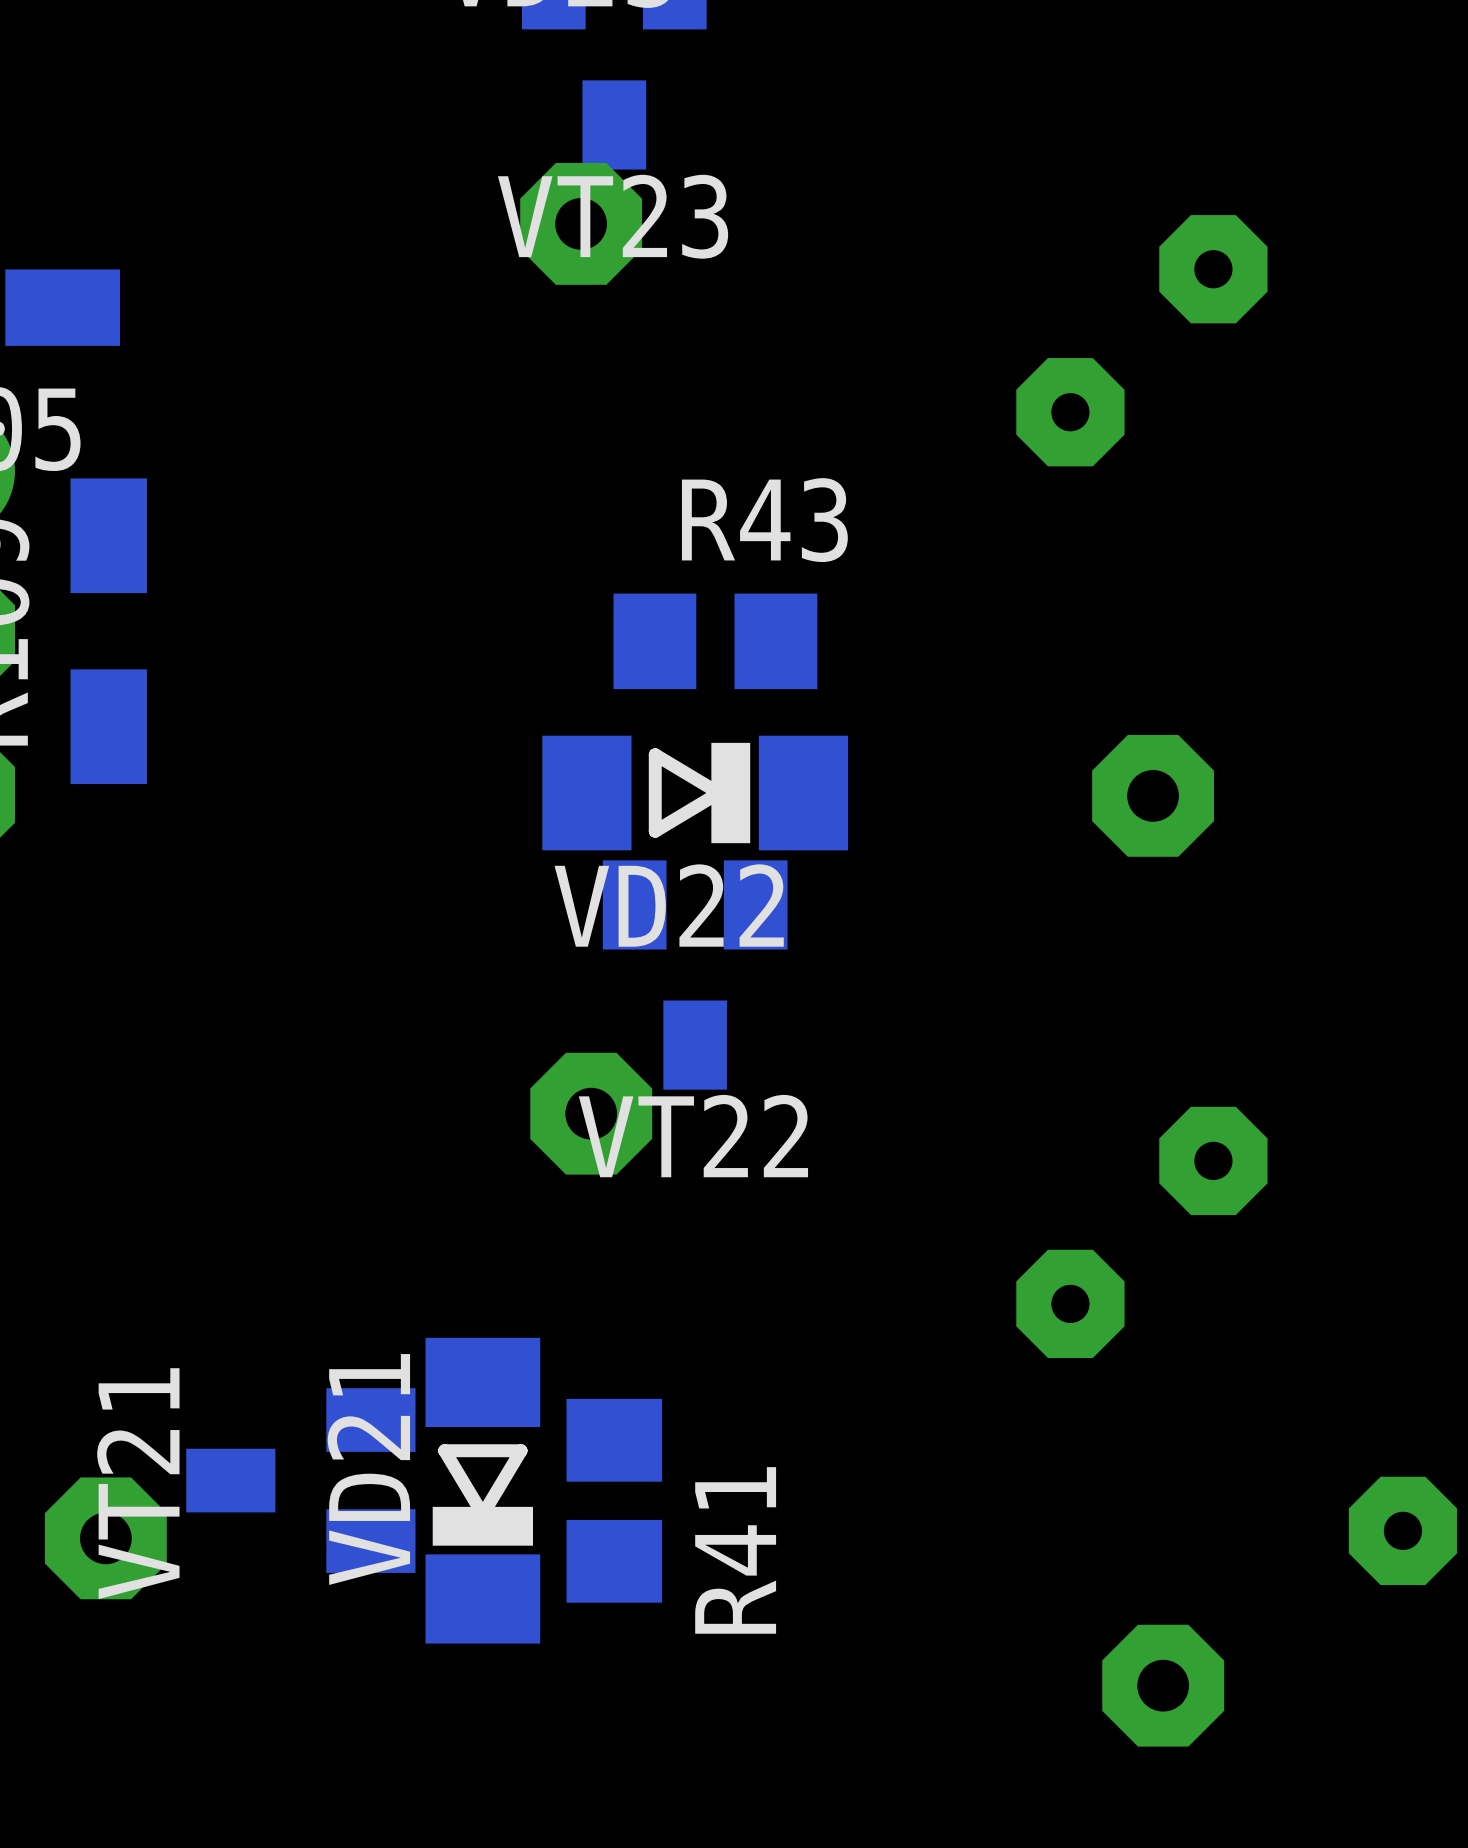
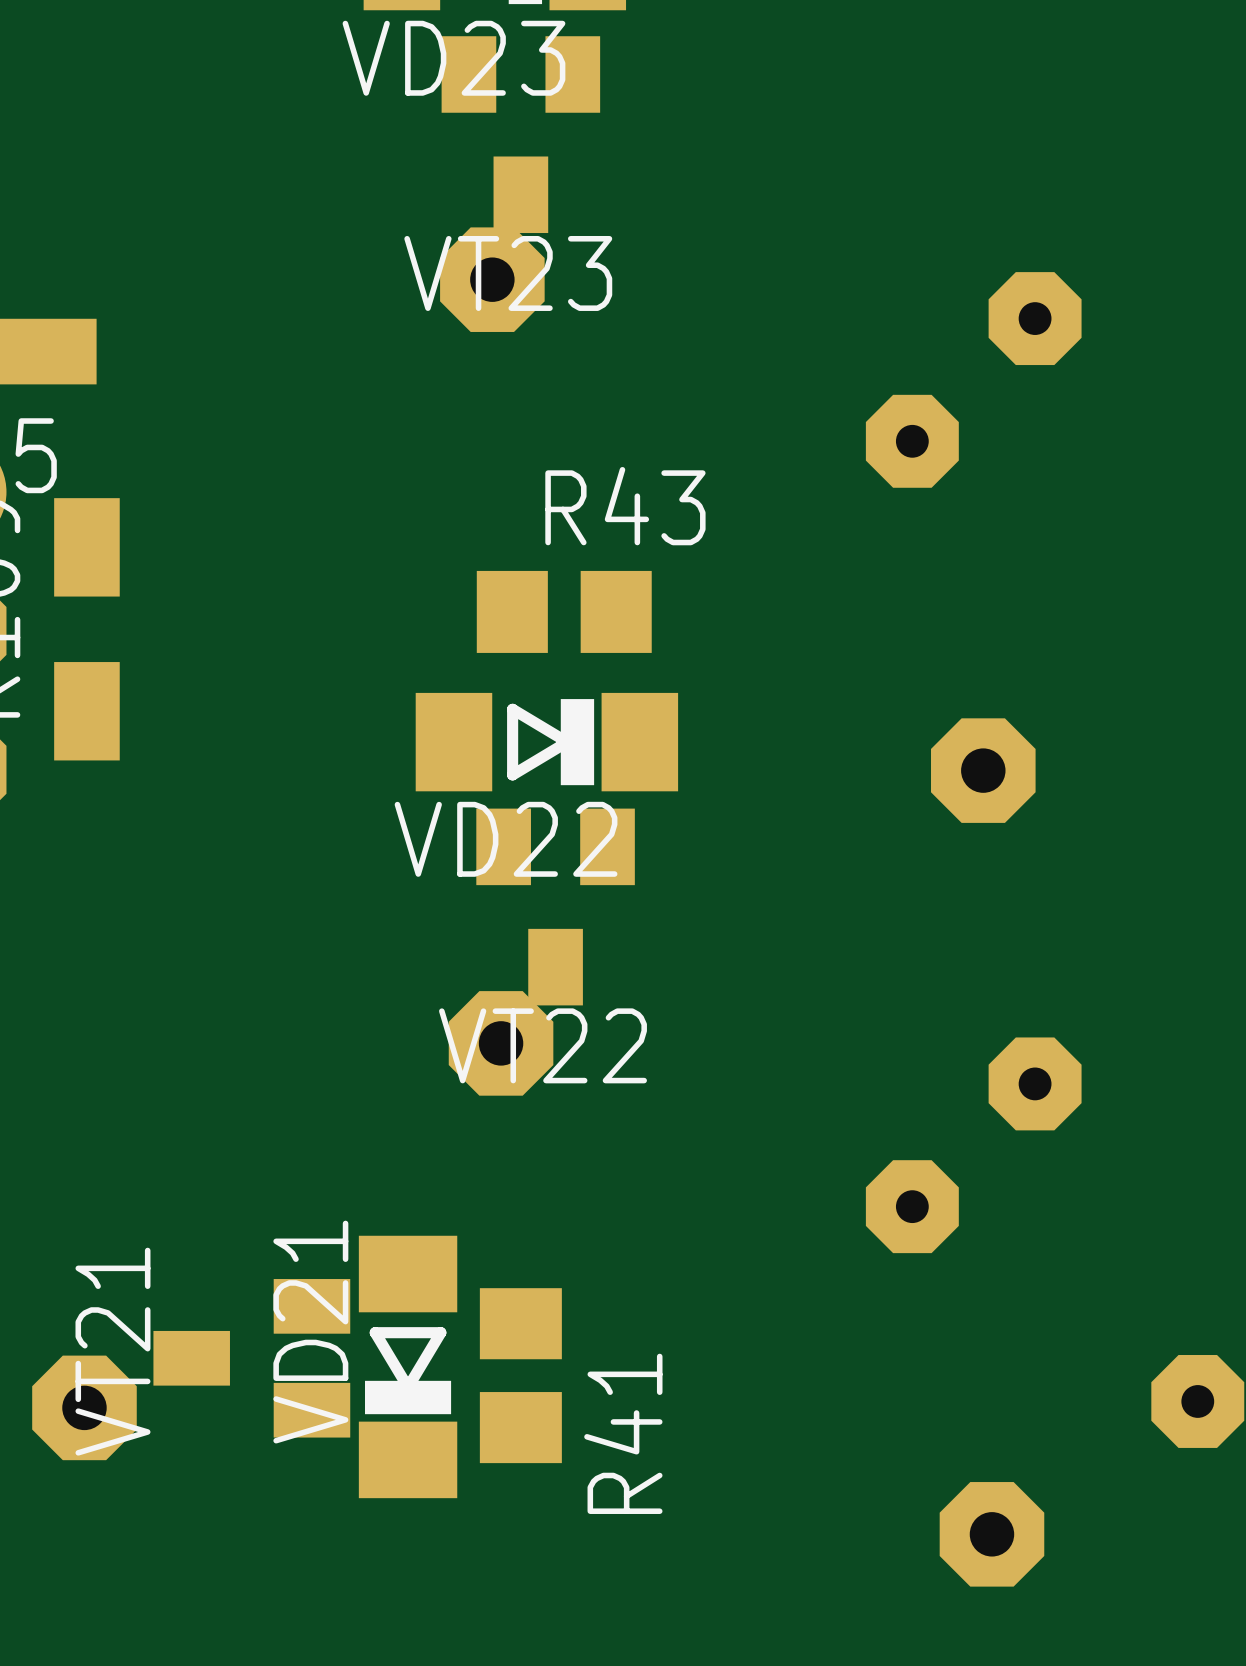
R43 position: (715, 641) -> (564, 611)
VD22 position: (695, 793) -> (546, 742)
VT22 position: (695, 975) -> (555, 907)

